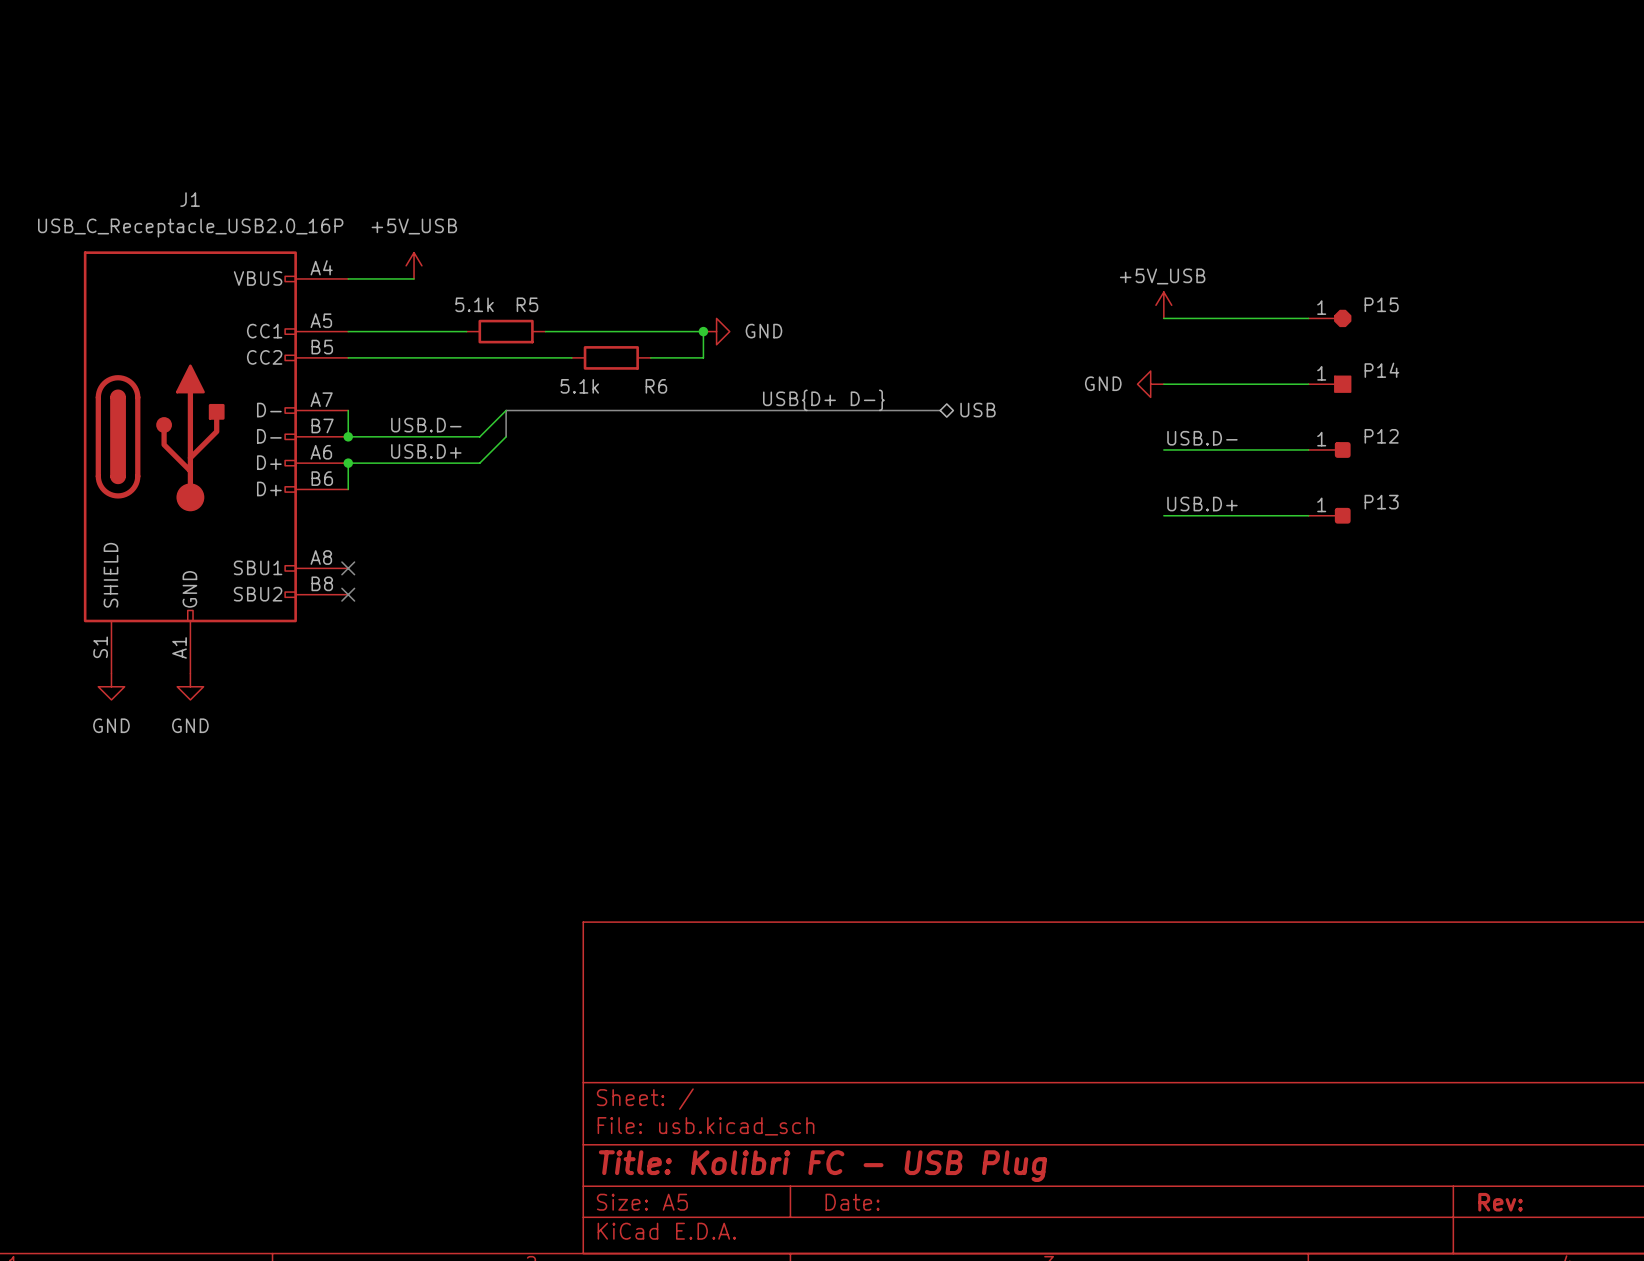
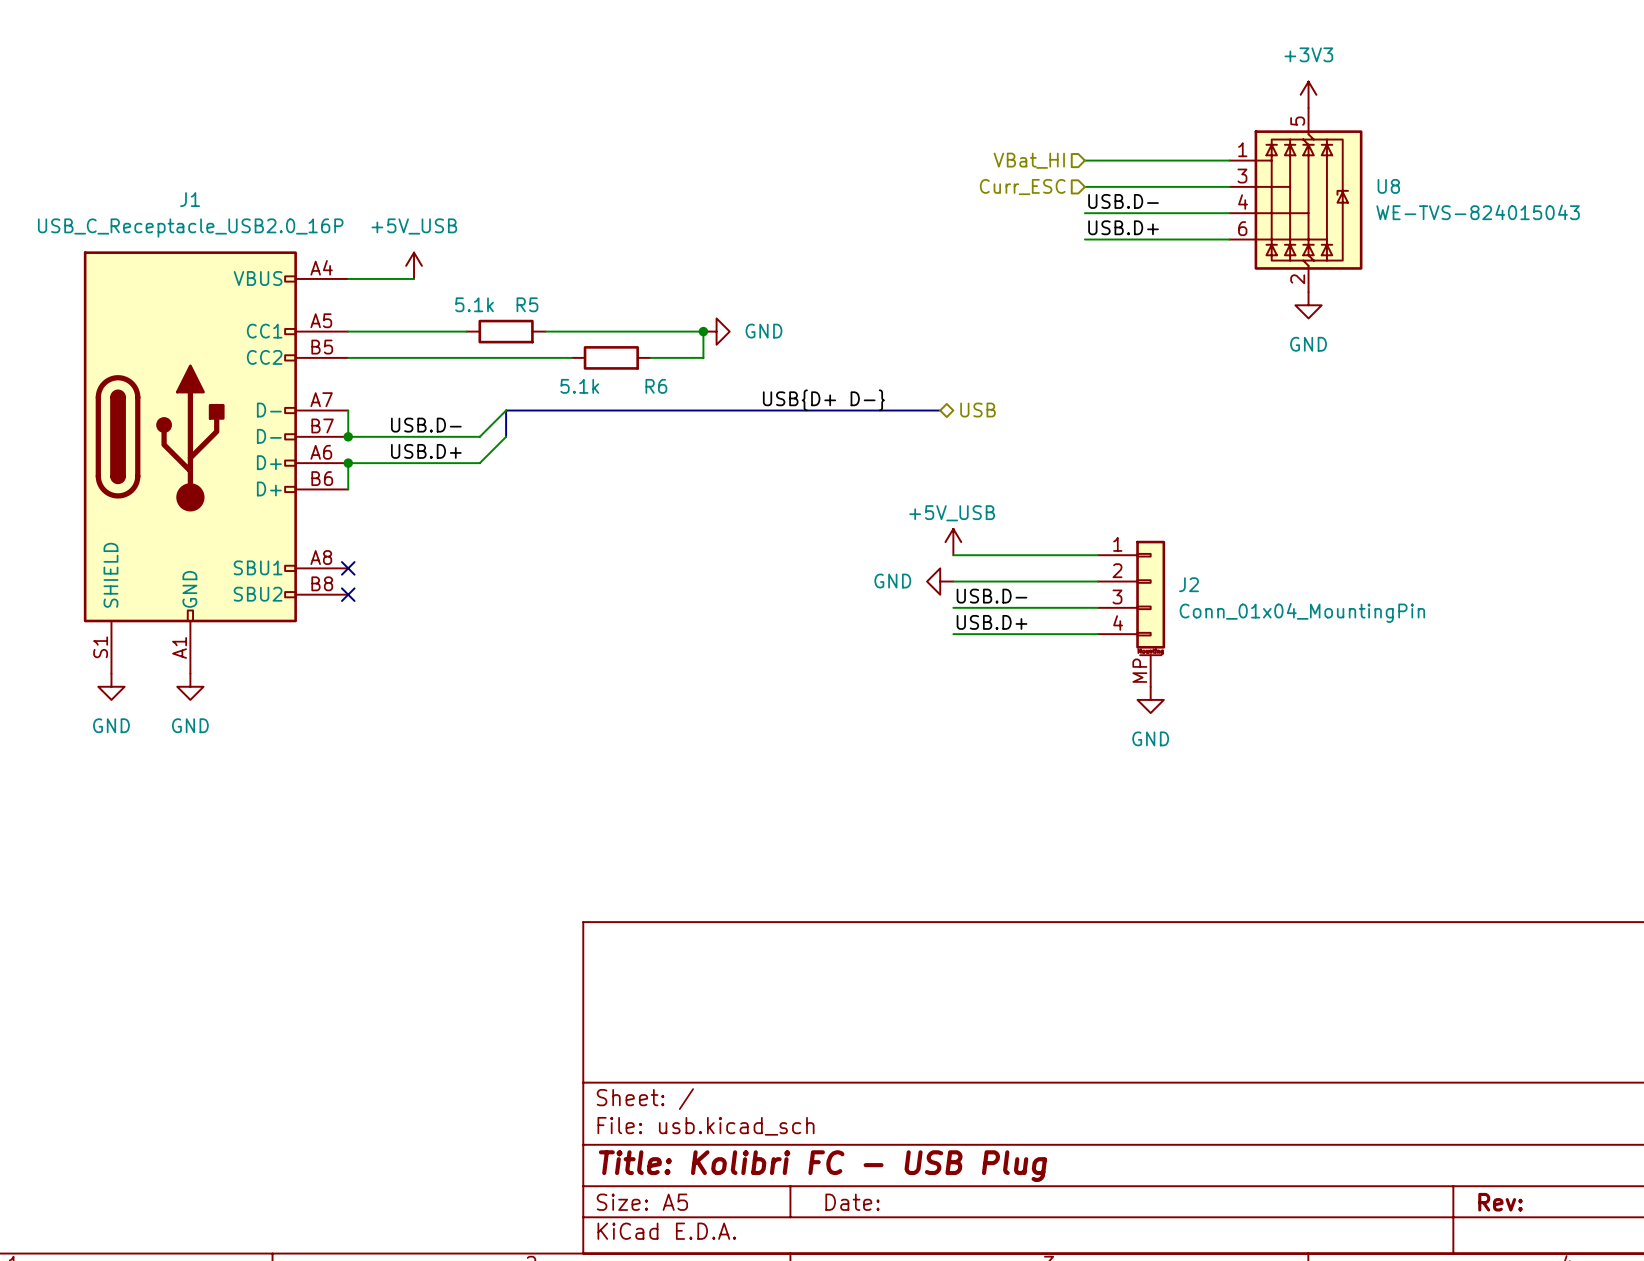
power symbol: none -> +3V3 (1308, 94)
hierarchical label: none -> VBat_HI (1029, 160)
wire: none -> (1084, 160) (1229, 160)
wire: none -> (1084, 186) (1229, 186)
hierarchical label: none -> Curr_ESC (1022, 187)
U8: none -> WE-TVS-824015043 (1296, 200)
label: none -> USB.D- (1123, 201)
label: none -> USB.D+ (1123, 227)
power symbol: +5V_USB (1163, 305) -> none
power symbol: none -> GND (1308, 305)
wire: (1163, 318) (1308, 318) -> (1084, 239) (1229, 239)
P15: (1329, 318) -> none
power symbol: GND (1150, 384) -> none
wire: (1163, 384) (1308, 384) -> (1084, 213) (1229, 213)
P14: (1329, 384) -> none
label: USB.D- (1202, 438) -> none
wire: (1163, 449) (1308, 449) -> (953, 581) (1098, 581)
P12: (1329, 449) -> none
label: USB.D+ (1202, 504) -> none
wire: (1163, 515) (1308, 515) -> (953, 555) (1098, 555)
P13: (1329, 515) -> none
power symbol: none -> +5V_USB (953, 542)
power symbol: none -> GND (940, 581)
label: none -> USB.D- (991, 596)
wire: none -> (953, 607) (1098, 607)
J2: none -> Conn_01x04_MountingPin (1131, 613)
label: none -> USB.D+ (991, 622)
wire: none -> (953, 634) (1098, 634)
power symbol: none -> GND (1150, 699)

